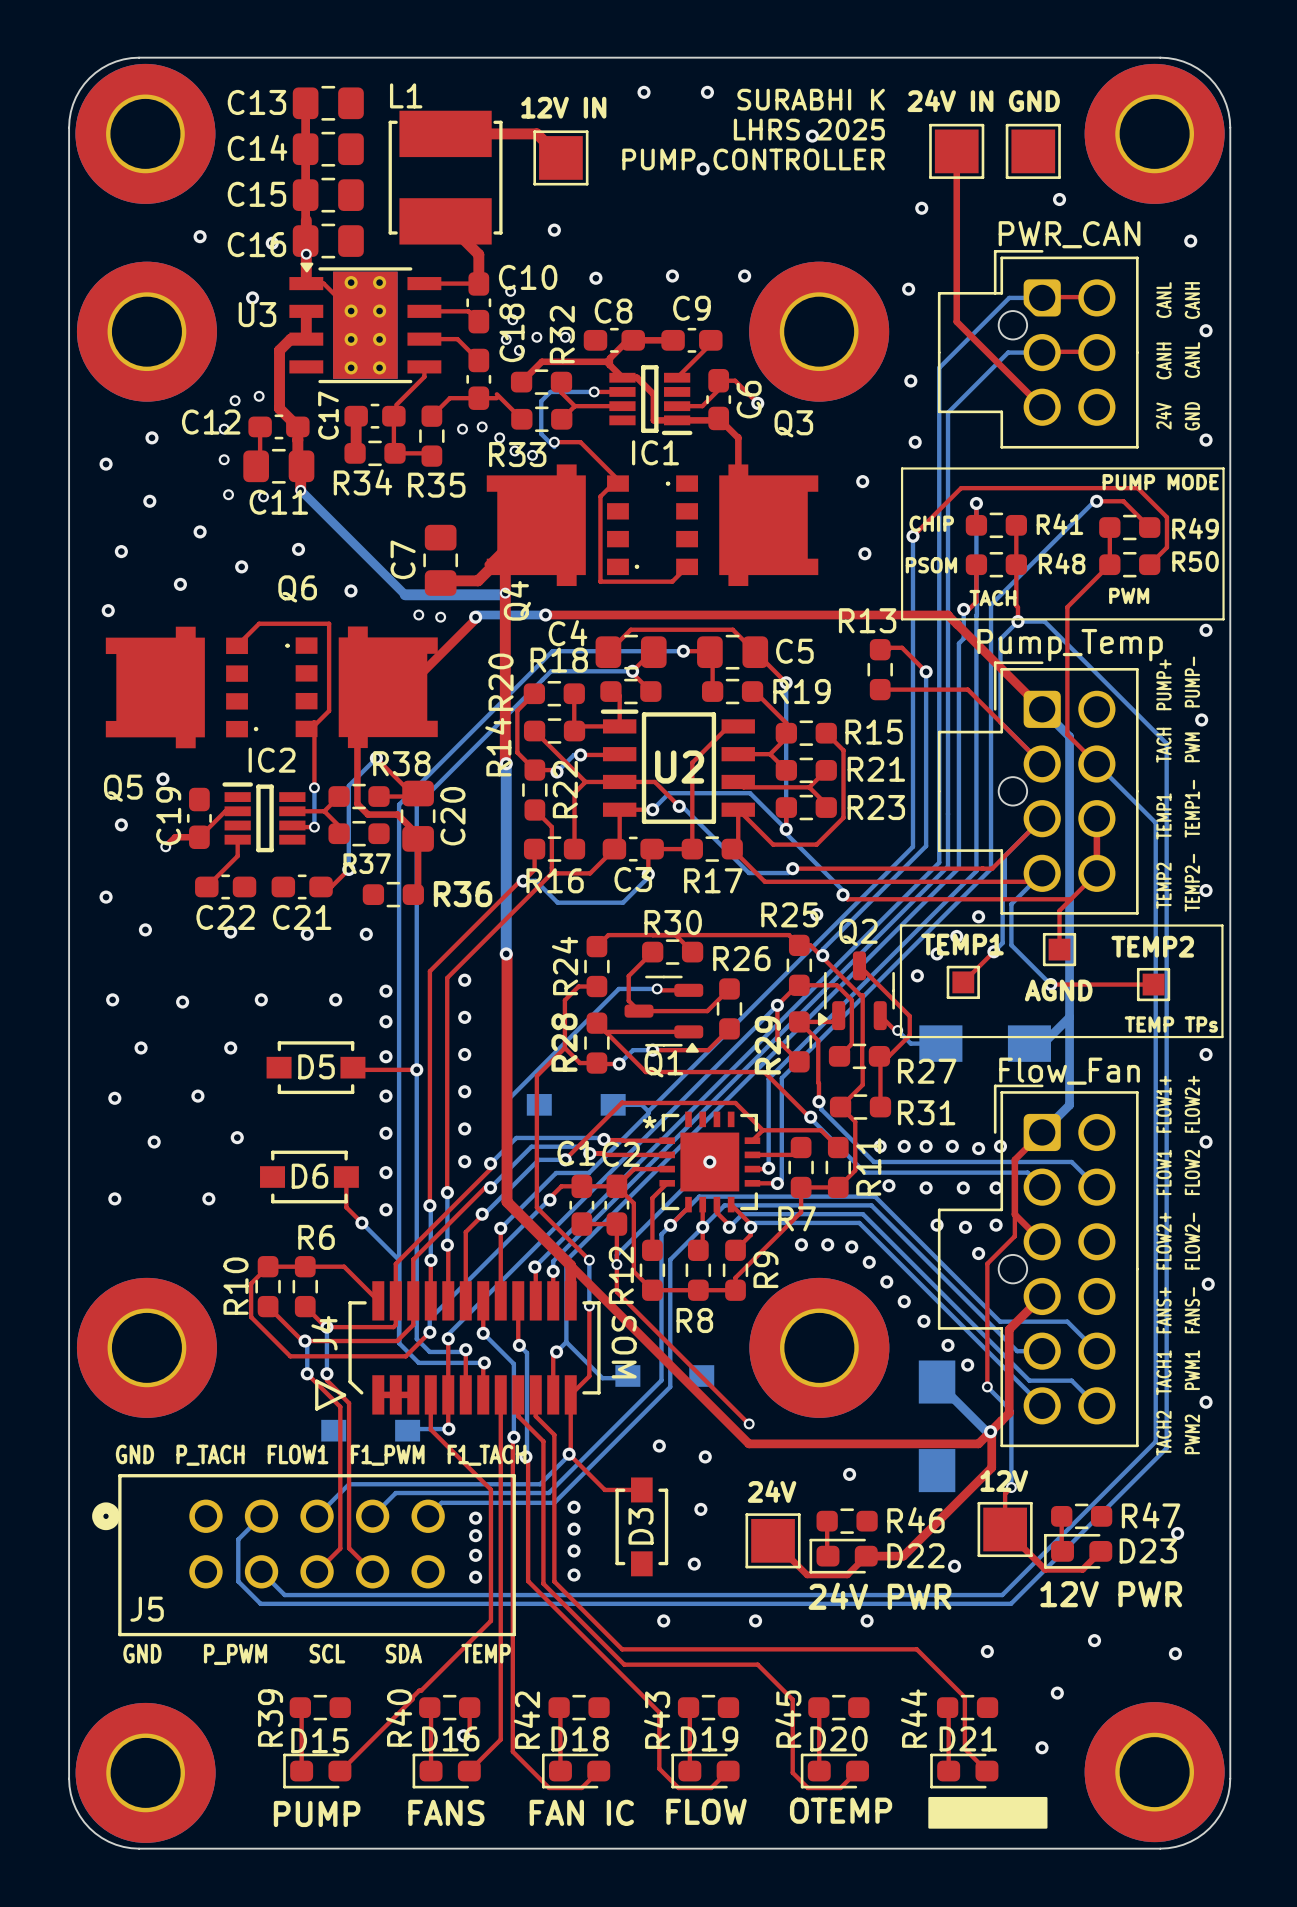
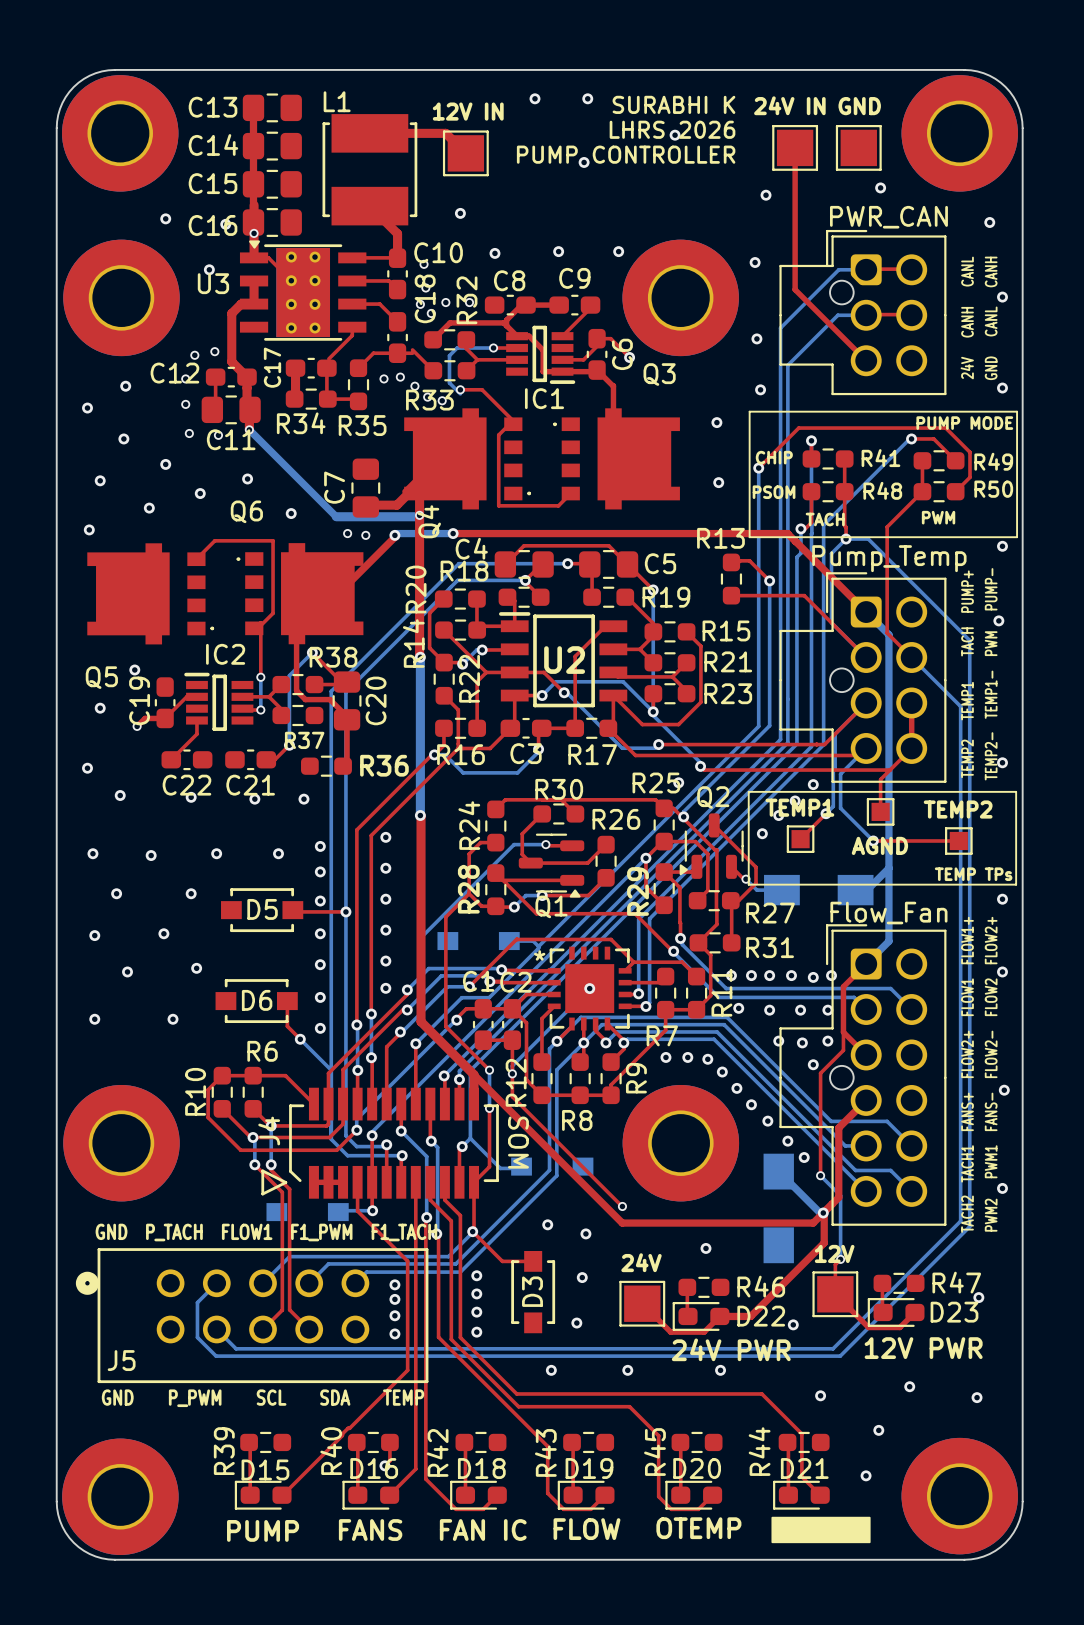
text: LHRS 2025 (809, 129) -> LHRS 2026 (672, 129)

